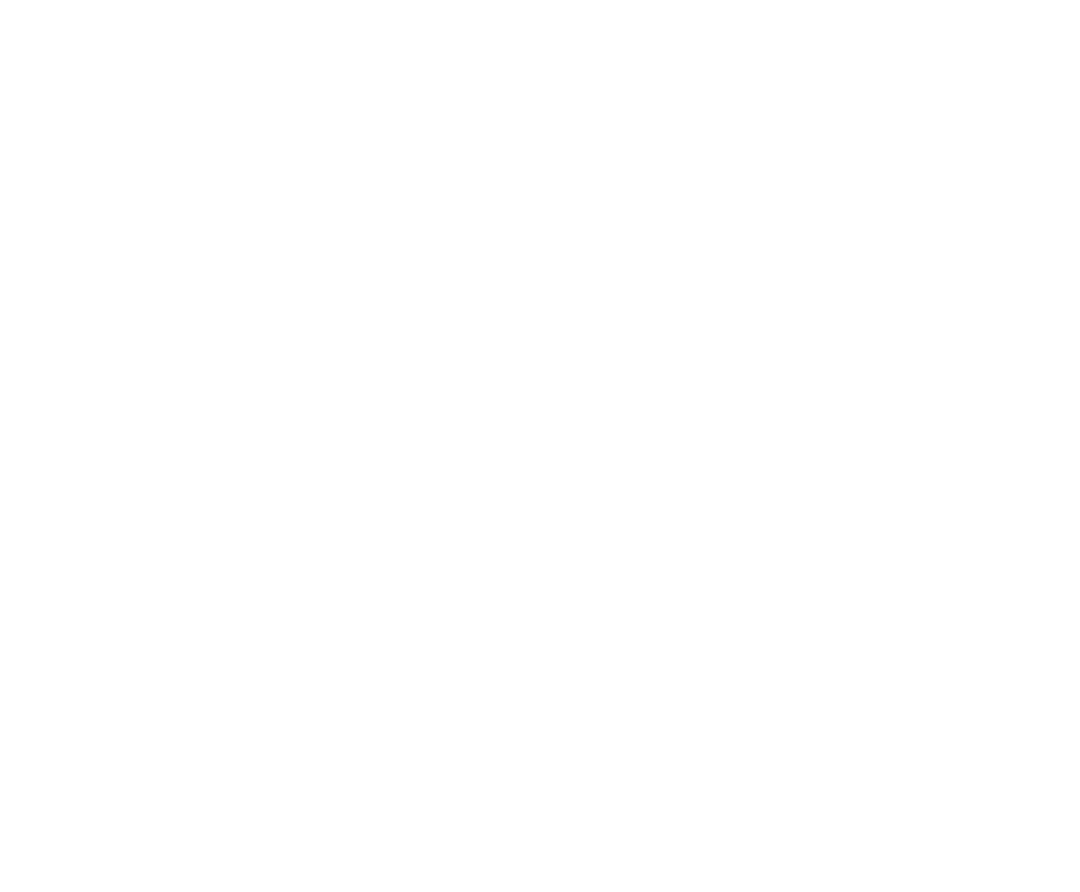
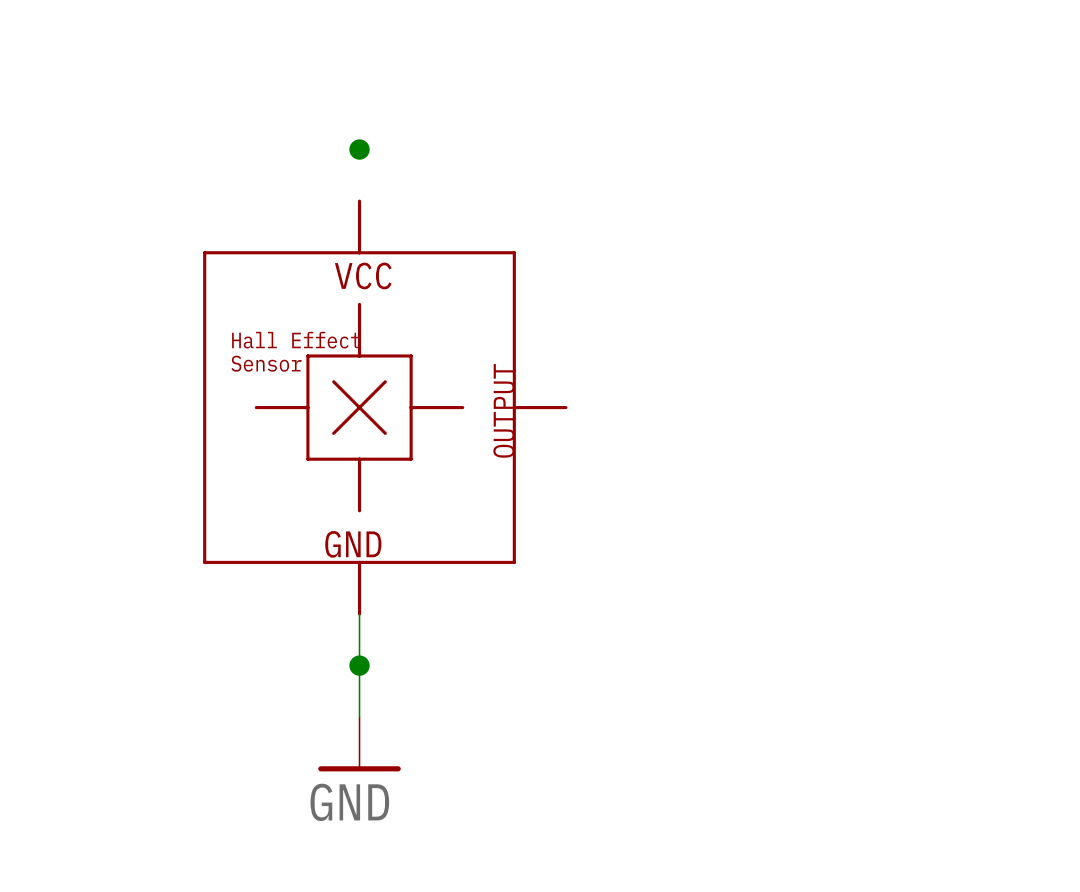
junction: none -> (359, 149)
part: none -> (385, 407)
wire: none -> (359, 614) (359, 717)
junction: none -> (359, 665)
power symbol: none -> GND (359, 744)

